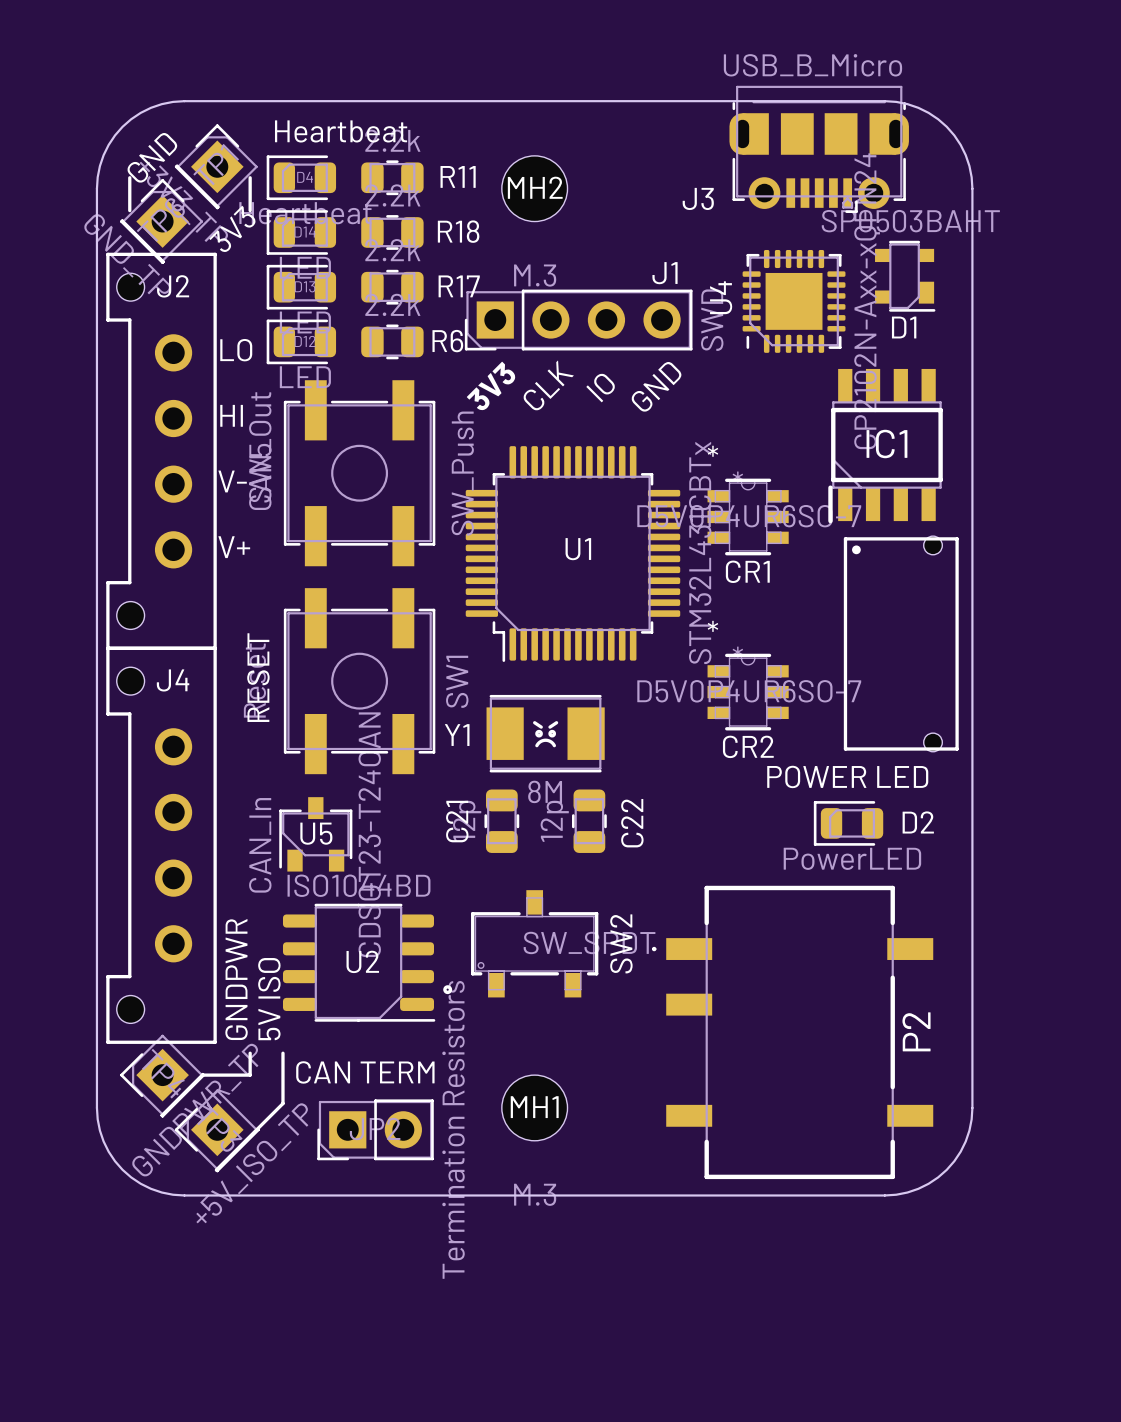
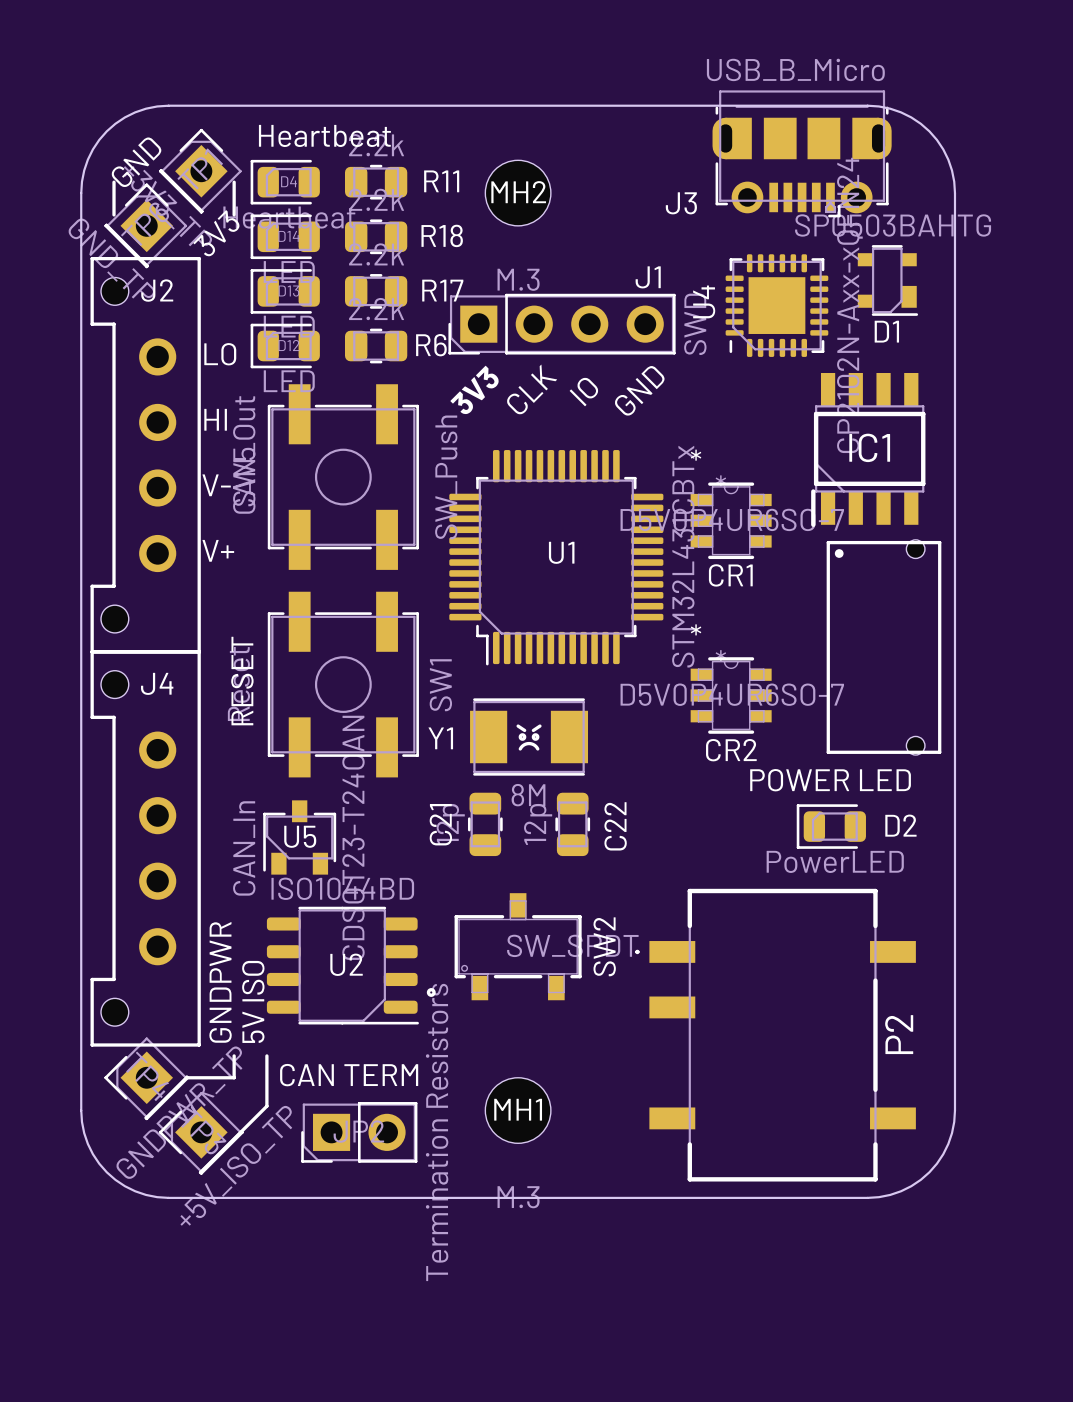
D1 value: SP0503BAHT (910, 221) -> SP0503BAHTG (893, 225)

